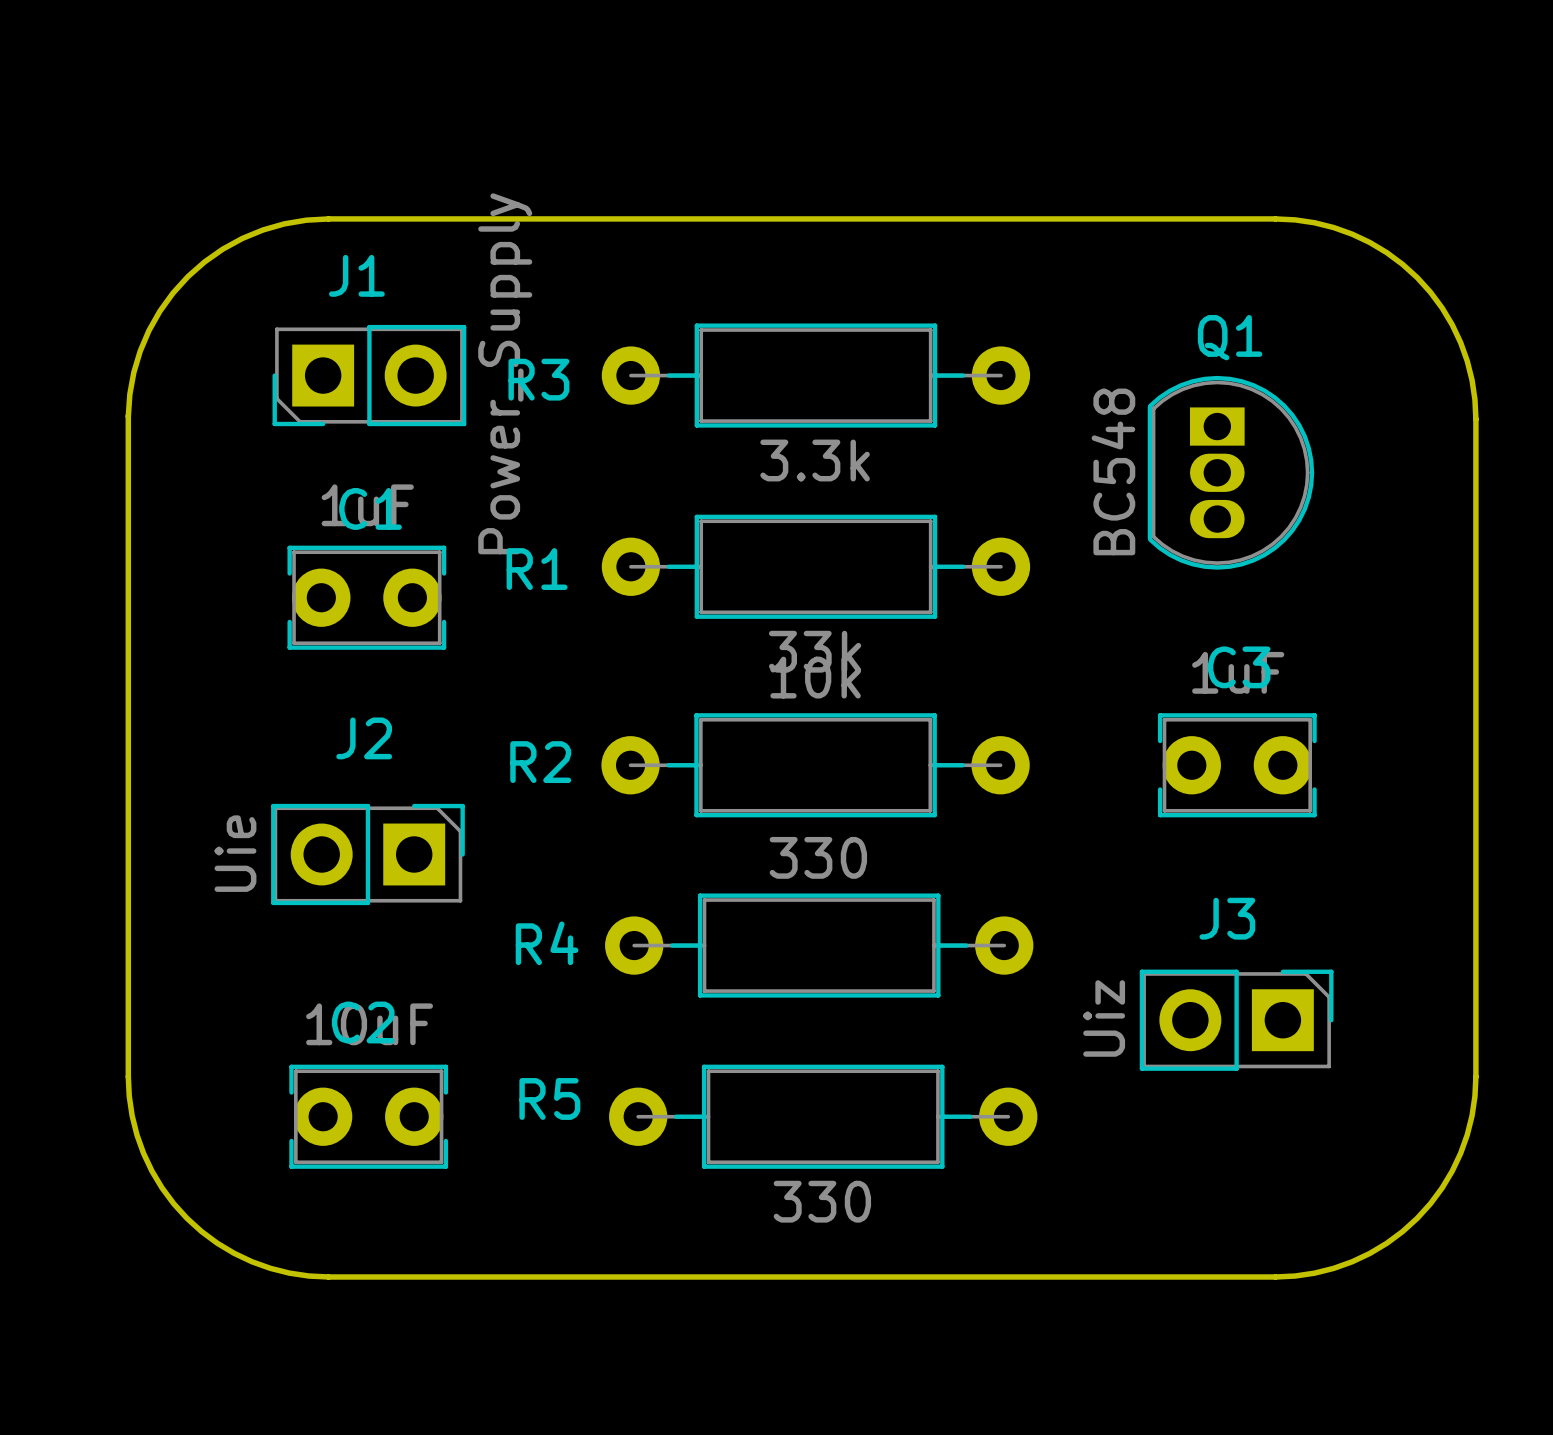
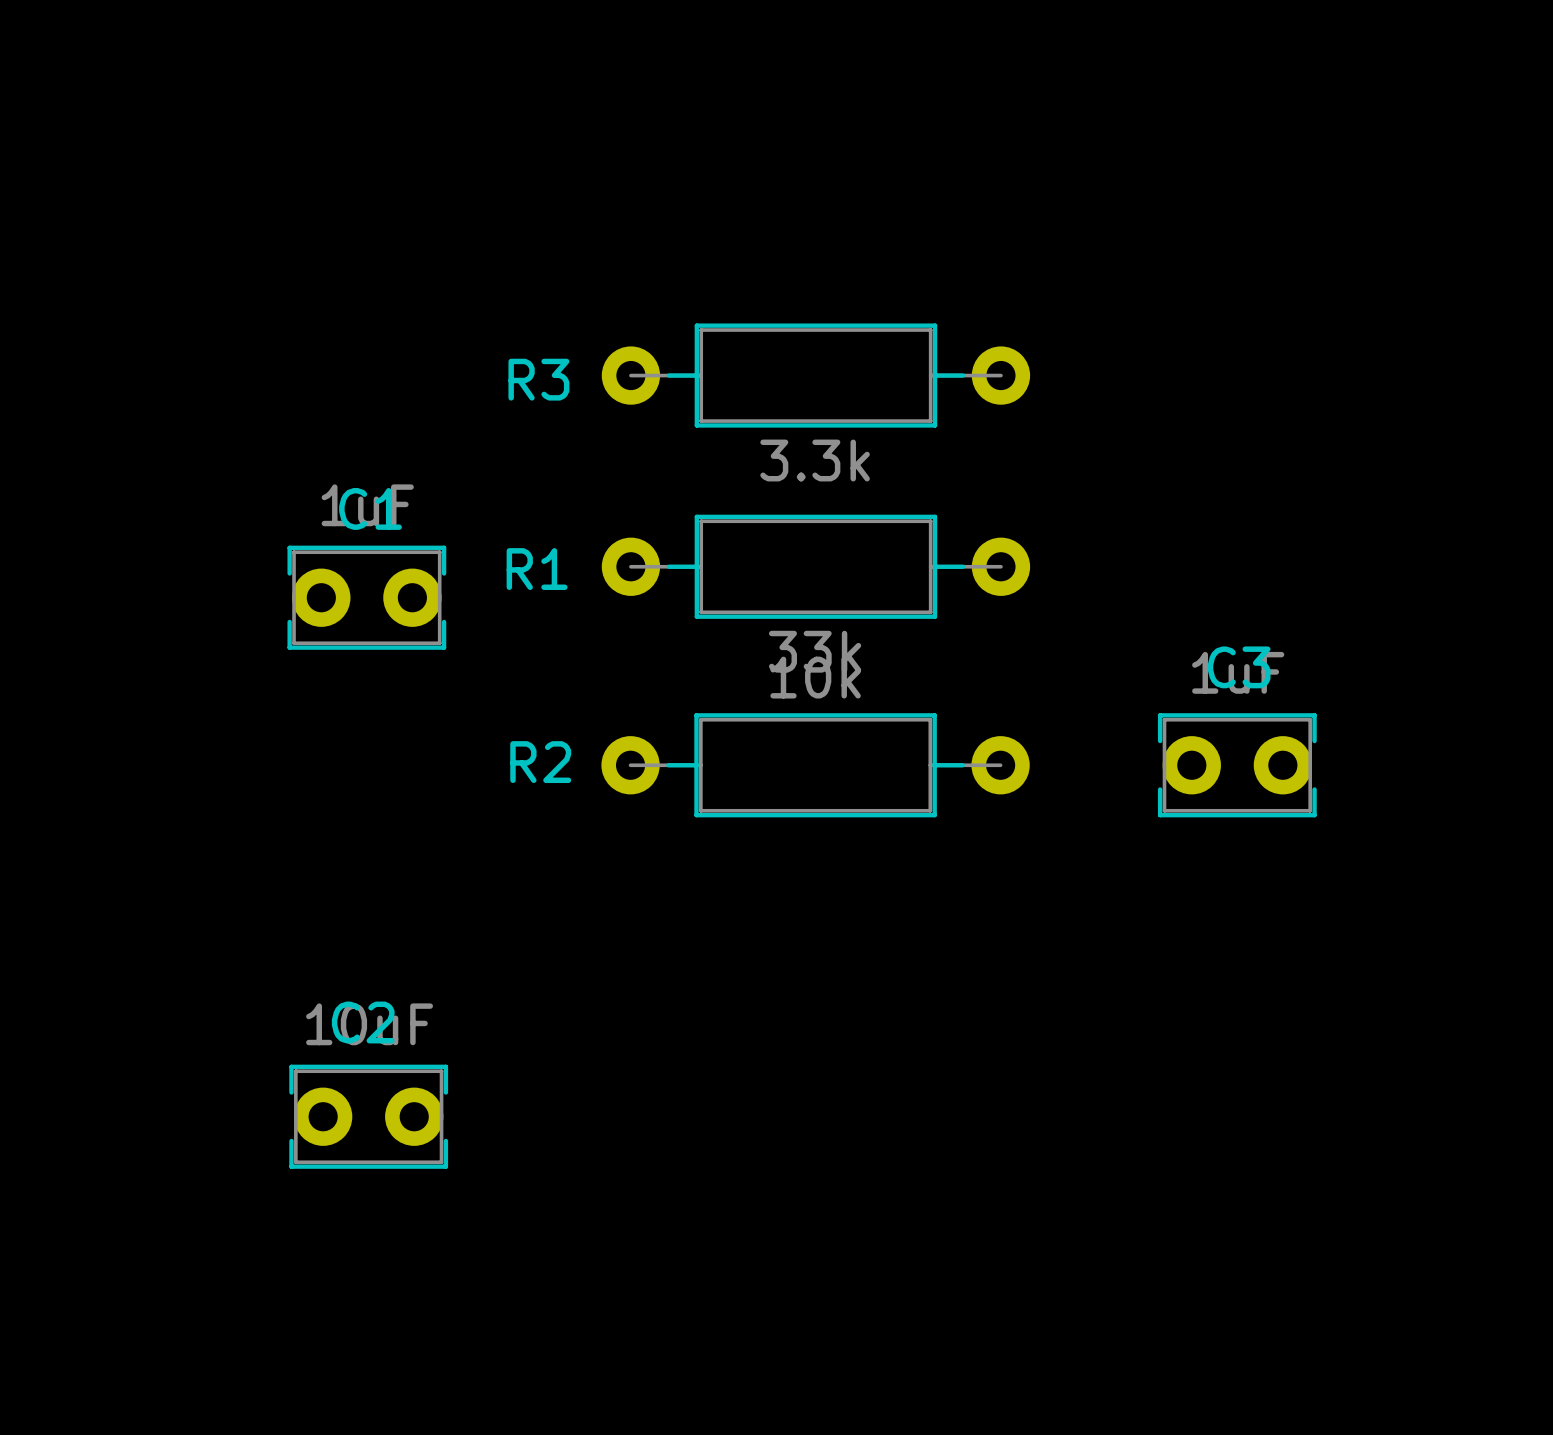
J1: Power_Supply (369, 375) -> none
board edge: (128, 415) (128, 1076) (129, 1096) (132, 1115) (143, 1153) (162, 1187) (186, 1218) (201, 1231) (234, 1253) (251, 1261) (289, 1273) (328, 1276) (1295, 1276) (1314, 1273) (1352, 1261) (1386, 1243) (1417, 1218) (1442, 1187) (1452, 1171) (1460, 1153) (1472, 1115) (1475, 1076) (1474, 399) (1472, 380) (1460, 342) (1442, 307) (1417, 277) (1402, 264) (1370, 242) (1352, 234) (1314, 222) (1275, 218) (306, 220) (262, 229) (242, 238) (204, 261) (172, 293) (148, 330) (140, 351) (133, 372) (128, 416) -> none
Q1: BC548 (1230, 472) -> none
J2: Uie (367, 854) -> none
R4: 330 (819, 945) -> none
J3: Uiz (1236, 1020) -> none
R5: 330 (823, 1116) -> none

